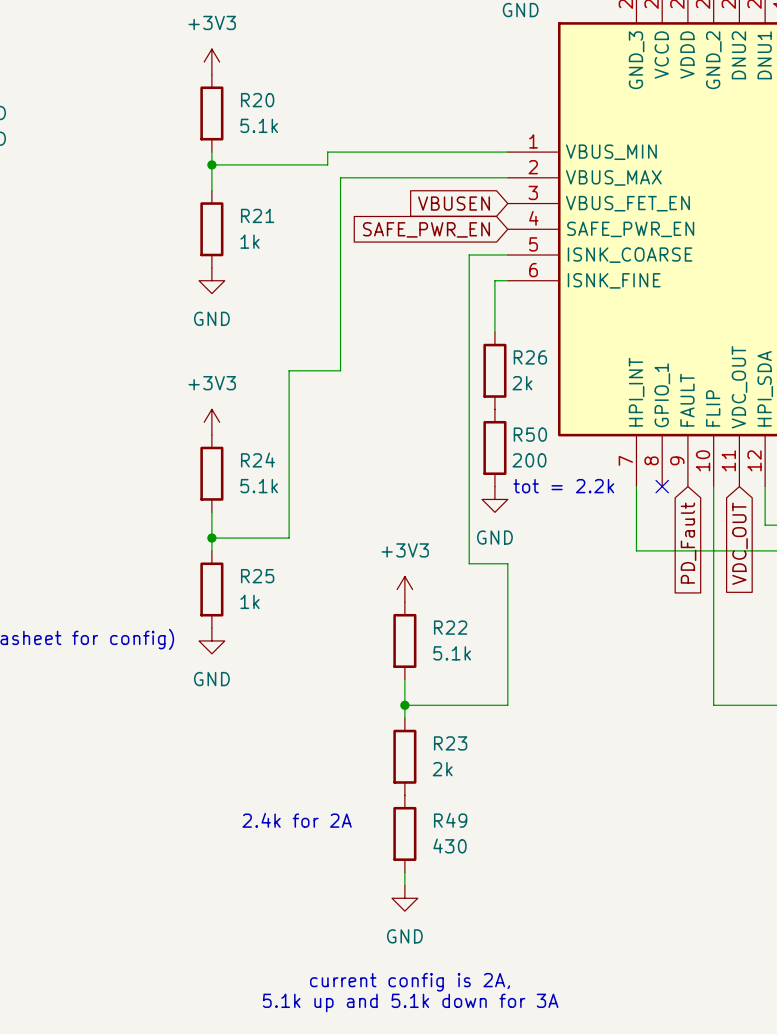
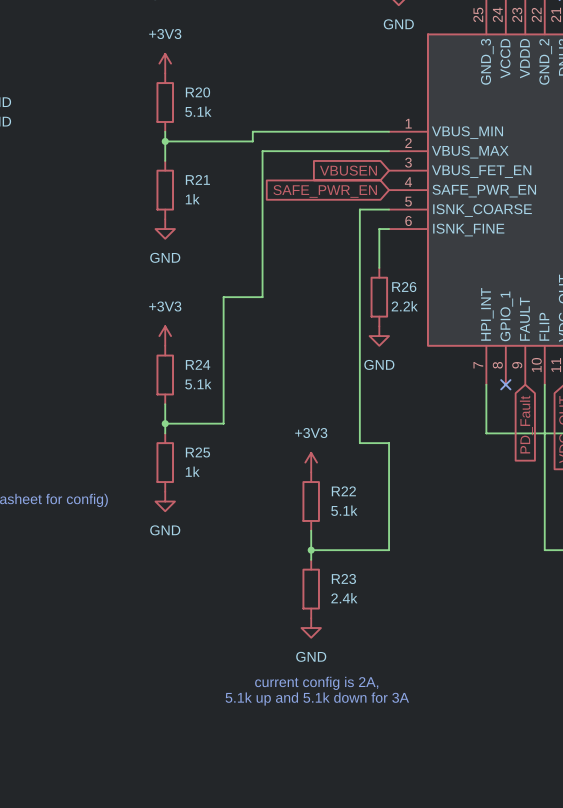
R26 value: 2k (522, 383) -> 2.2k (404, 306)
R50: 200 (494, 447) -> none
text: tot = 2.2k (563, 486) -> none
power symbol position: GND (494, 499) -> GND (379, 336)
R23 value: 2k (442, 769) -> 2.4k (344, 598)
text: 2.4k for 2A (297, 820) -> none
R49: 430 (404, 833) -> none
wire: (404, 872) (404, 885) -> none
power symbol position: GND (404, 898) -> GND (311, 628)
text position: current config is 2A, (410, 982) -> current config is 2A, (316, 683)
text position: 5.1k up and 5.1k down for 3A (410, 1002) -> 5.1k up and 5.1k down for 3A (317, 699)

